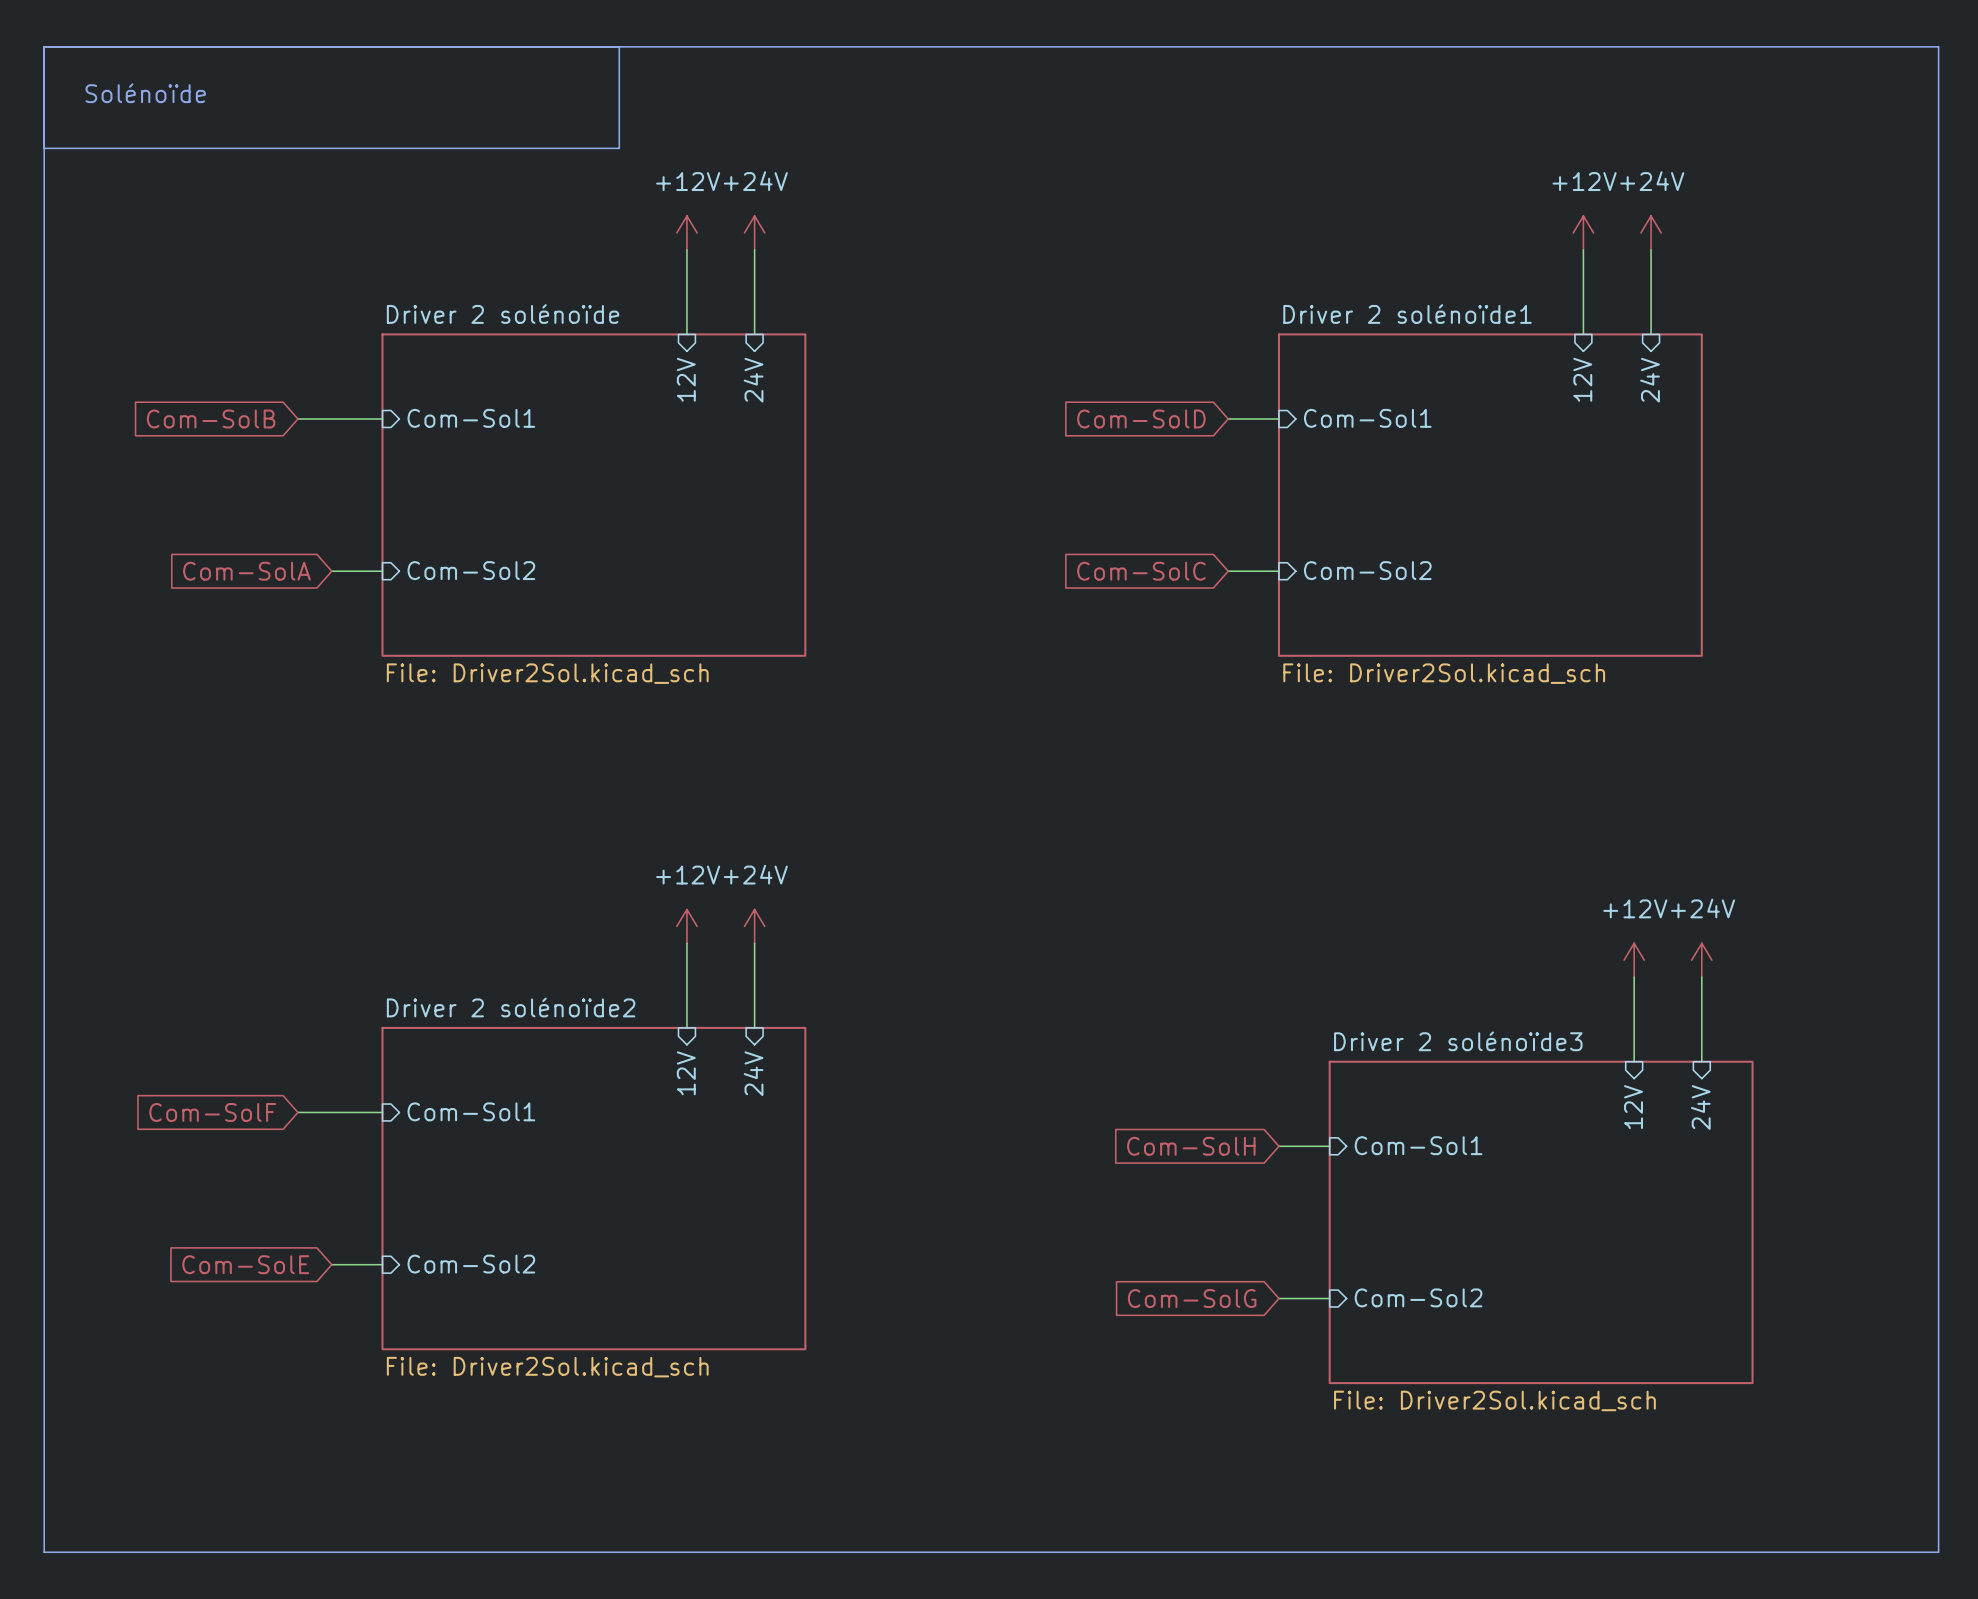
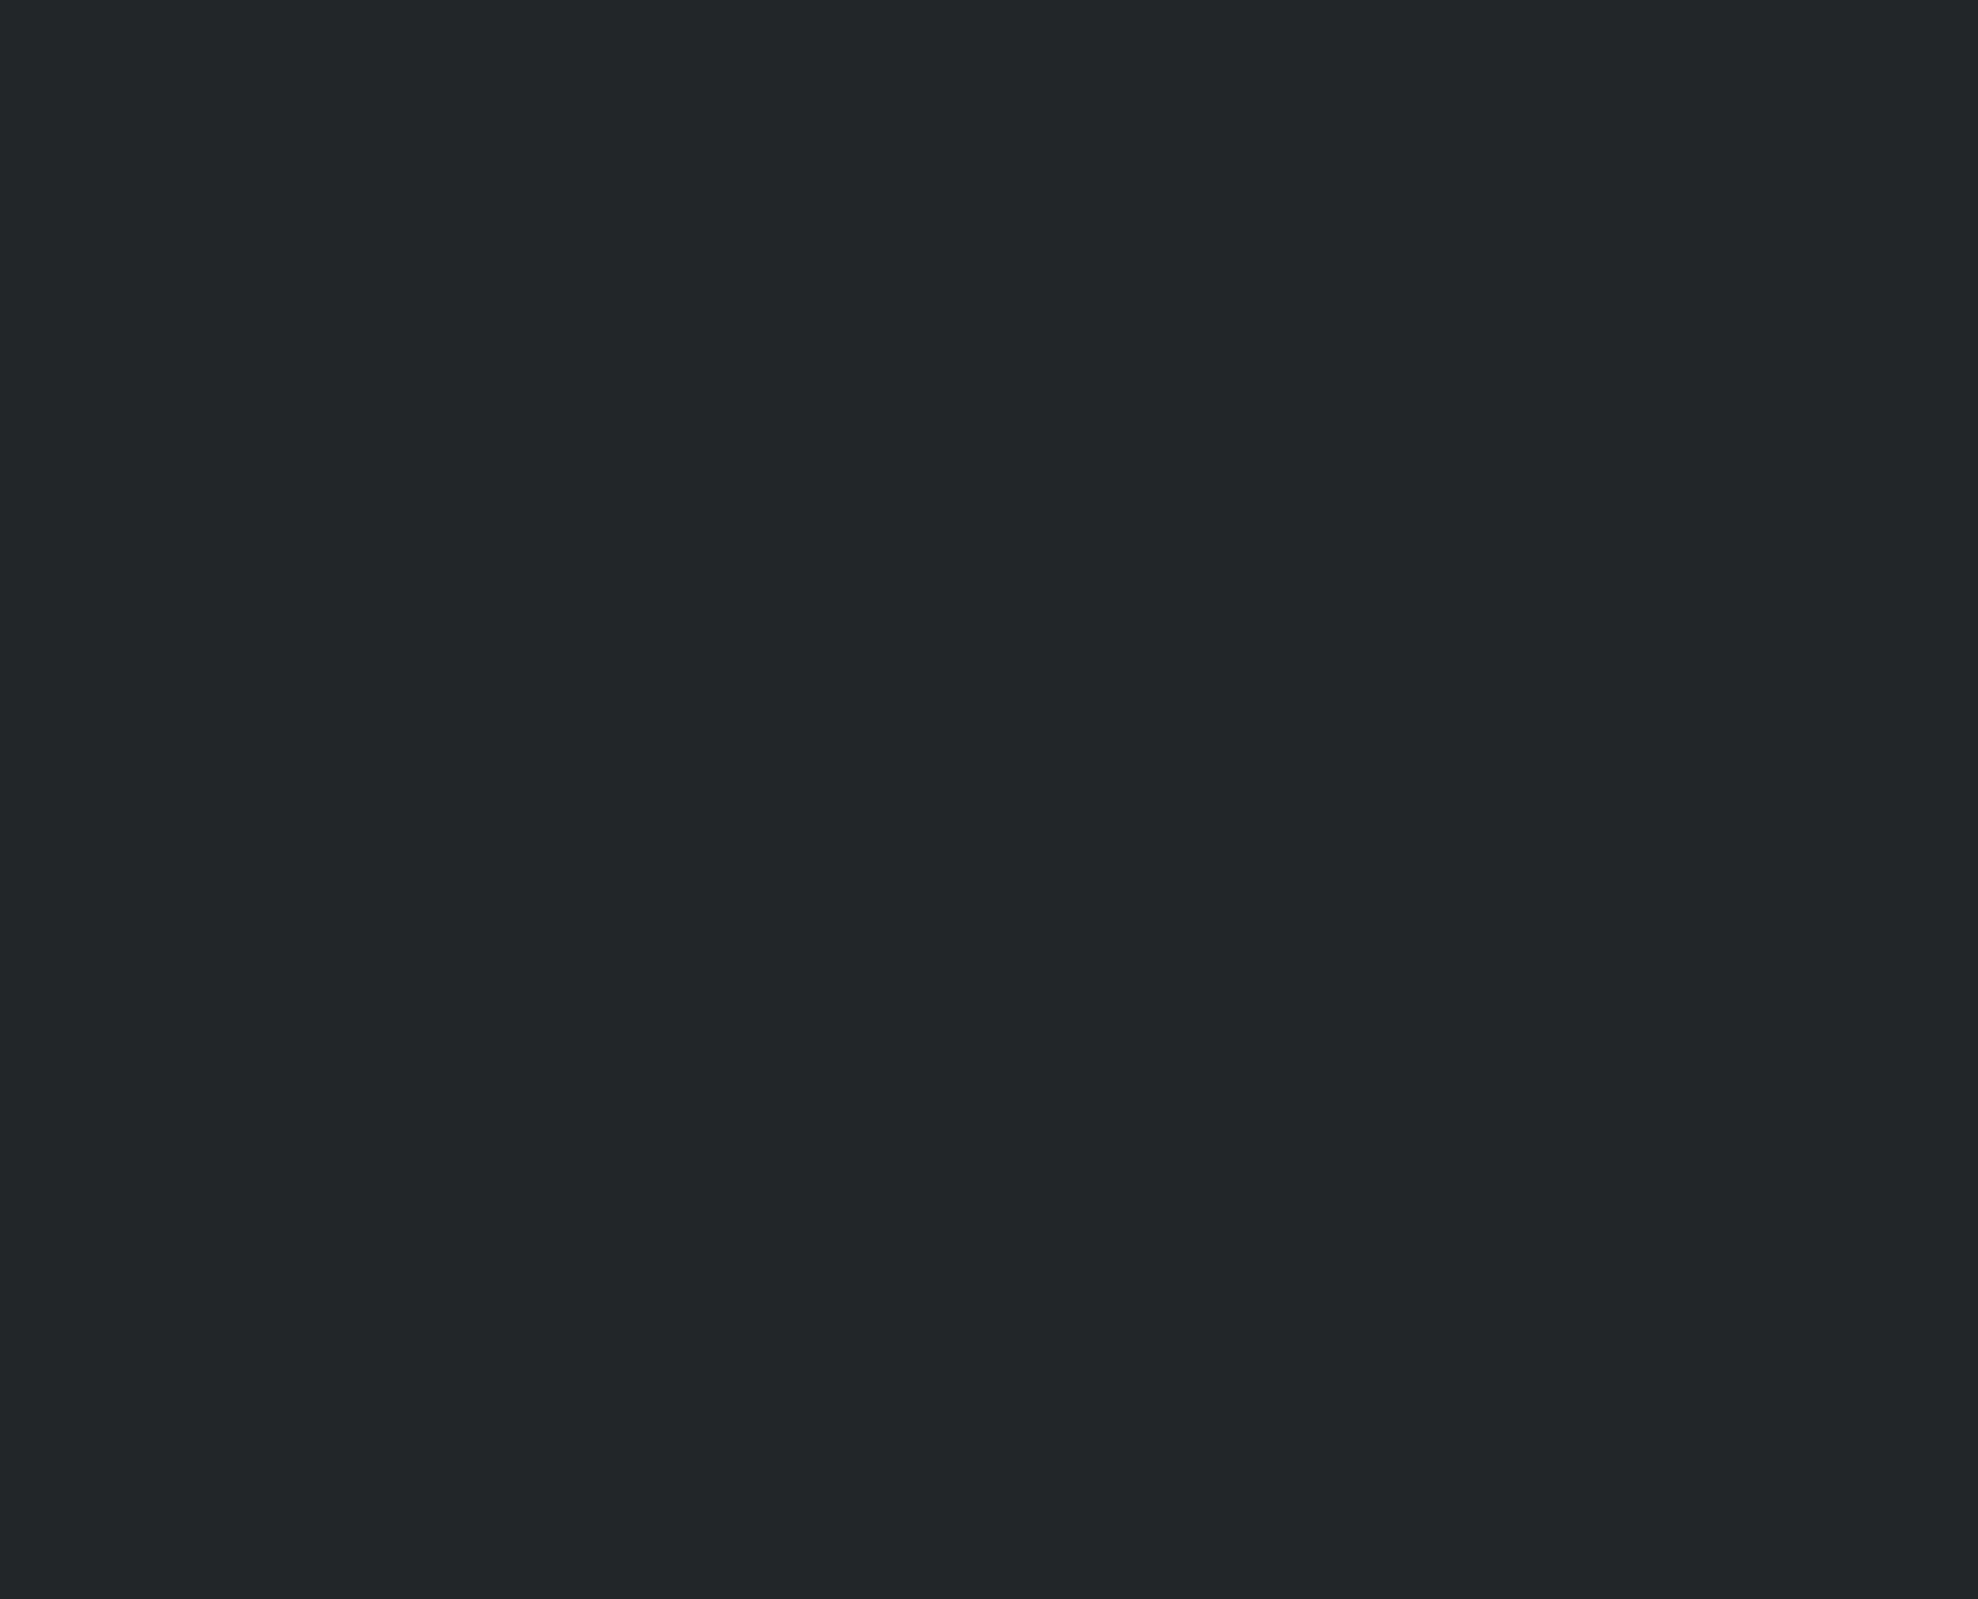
line: (44, 46) (1938, 46) (1938, 1552) (44, 1552) (44, 46) -> none
line: (619, 46) (619, 148) (44, 148) -> none
text: Solénoïde (145, 93) -> none
power symbol: +12V (686, 232) -> none
power symbol: +24V (754, 232) -> none
power symbol: +12V (1583, 232) -> none
power symbol: +24V (1651, 232) -> none
wire: (686, 249) (686, 334) -> none
wire: (754, 249) (754, 334) -> none
wire: (1583, 249) (1583, 334) -> none
wire: (1651, 249) (1651, 334) -> none
sheet pin: 12V (686, 379) -> none
sheet pin: 12V (1582, 379) -> none
sheet pin: 24V (753, 380) -> none
sheet pin: 24V (1650, 380) -> none
global label: Com-SolB (211, 418) -> none
wire: (297, 418) (382, 418) -> none
sheet pin: Com-Sol1 (471, 418) -> none
global label: Com-SolD (1141, 418) -> none
wire: (1228, 418) (1278, 418) -> none
sheet pin: Com-Sol1 (1367, 418) -> none
sheet Driver 2 solénoïde: File: Driver2Sol.kicad_sch (593, 495) -> none
sheet Driver 2 solénoïde1: File: Driver2Sol.kicad_sch (1490, 495) -> none
sheet pin: Com-Sol2 (471, 570) -> none
sheet pin: Com-Sol2 (1367, 570) -> none
global label: Com-SolA (246, 571) -> none
wire: (331, 571) (382, 571) -> none
global label: Com-SolC (1141, 571) -> none
wire: (1228, 571) (1278, 571) -> none
power symbol: +12V (686, 926) -> none
power symbol: +24V (754, 926) -> none
wire: (686, 943) (686, 1027) -> none
wire: (754, 943) (754, 1027) -> none
power symbol: +12V (1634, 960) -> none
power symbol: +24V (1701, 960) -> none
wire: (1634, 977) (1634, 1061) -> none
wire: (1701, 977) (1701, 1061) -> none
sheet pin: 12V (686, 1073) -> none
sheet pin: 24V (753, 1073) -> none
sheet pin: 12V (1633, 1107) -> none
sheet pin: 24V (1700, 1107) -> none
sheet pin: Com-Sol1 (471, 1111) -> none
global label: Com-SolF (212, 1112) -> none
wire: (297, 1112) (382, 1112) -> none
sheet pin: Com-Sol1 (1418, 1145) -> none
global label: Com-SolH (1191, 1146) -> none
wire: (1278, 1146) (1329, 1146) -> none
sheet Driver 2 solénoïde2: File: Driver2Sol.kicad_sch (593, 1188) -> none
sheet Driver 2 solénoïde3: File: Driver2Sol.kicad_sch (1541, 1222) -> none
global label: Com-SolE (245, 1264) -> none
wire: (331, 1264) (382, 1264) -> none
sheet pin: Com-Sol2 (471, 1264) -> none
sheet pin: Com-Sol2 (1418, 1297) -> none
global label: Com-SolG (1192, 1298) -> none
wire: (1278, 1298) (1329, 1298) -> none

